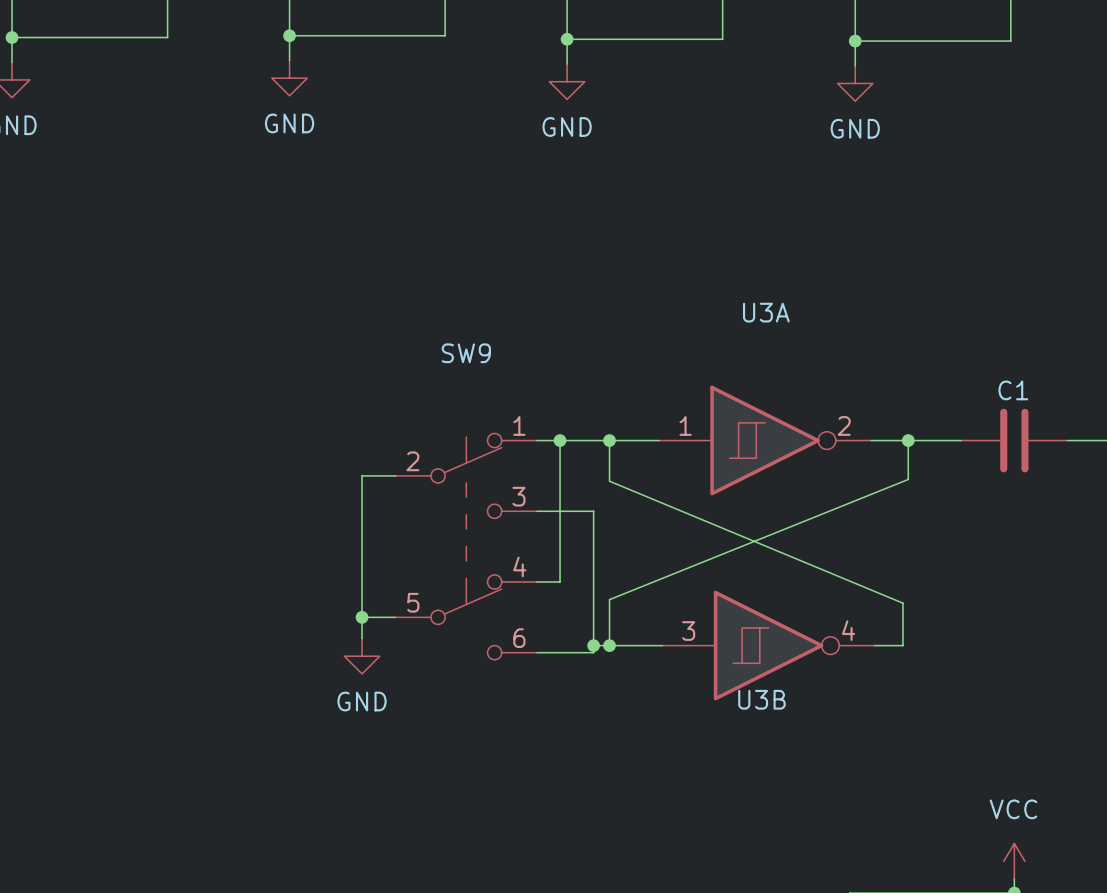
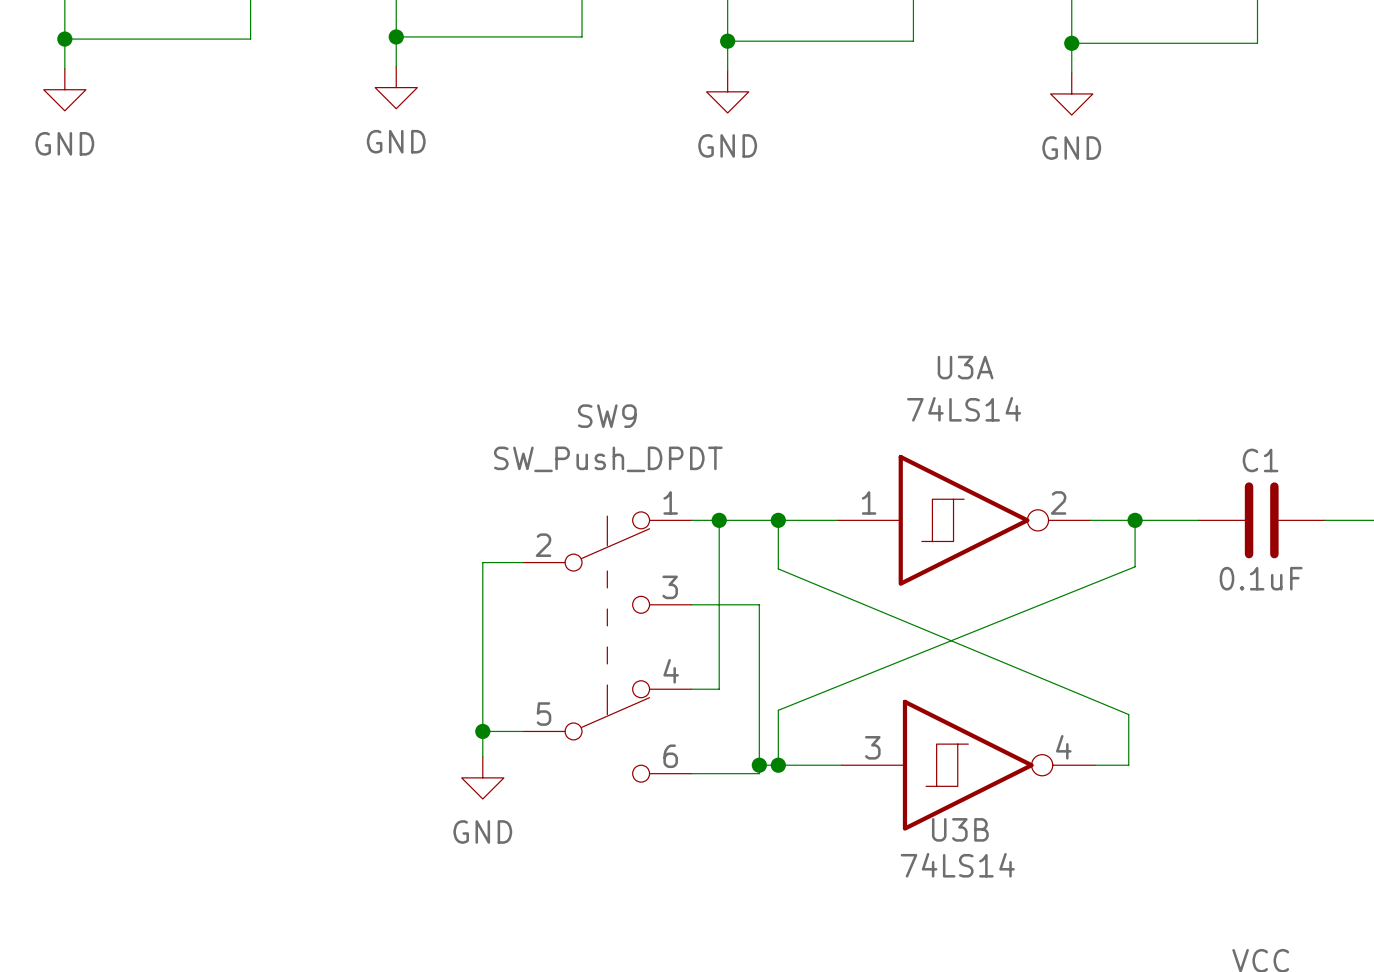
U3A value: none -> 74LS14 (964, 409)
SW9 value: none -> SW_Push_DPDT (608, 459)
C1 value: none -> 0.1uF (1261, 578)
U3B value: none -> 74LS14 (957, 865)

